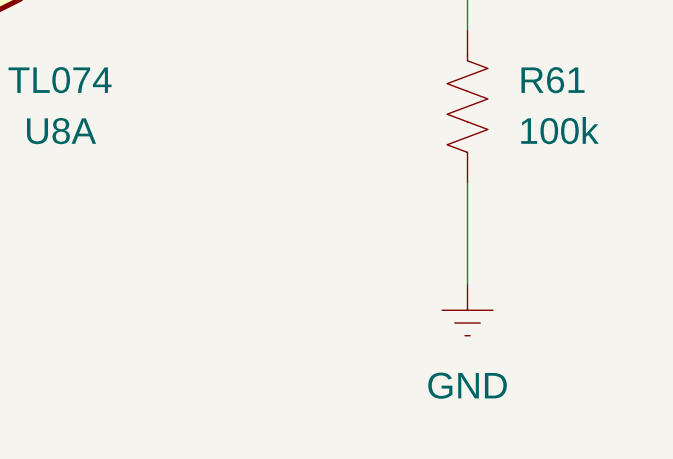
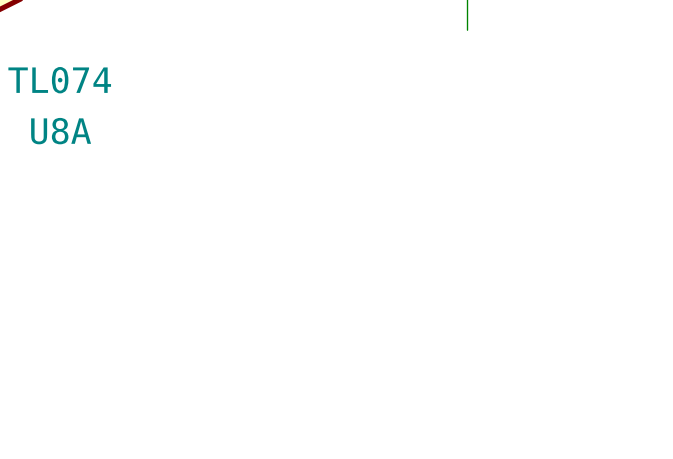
R61: 100k (467, 106) -> none
wire: (467, 182) (467, 284) -> none
power symbol: GND (467, 310) -> none

